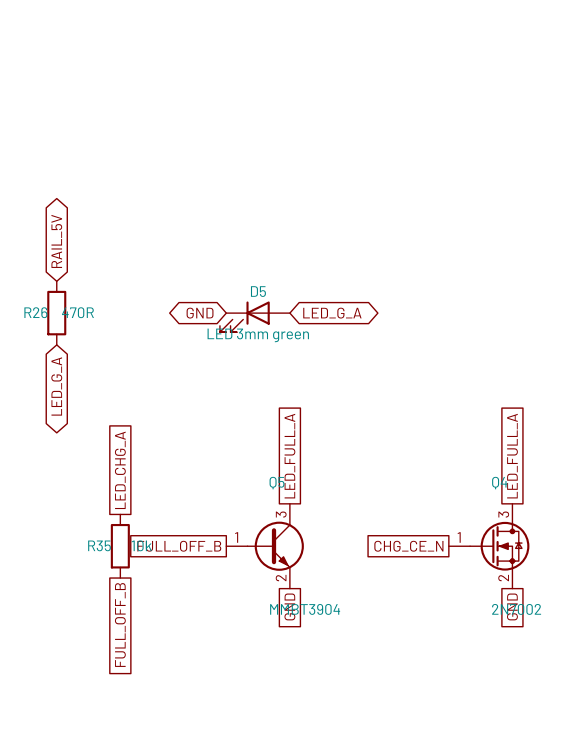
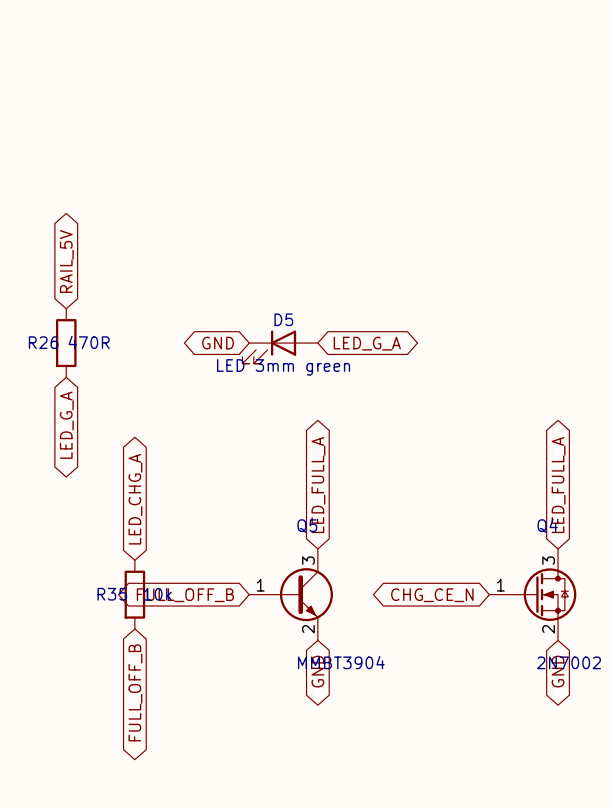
global label shape: passive (289, 456) -> bidirectional (318, 485)
global label shape: passive (512, 456) -> bidirectional (558, 485)
global label shape: passive (120, 470) -> bidirectional (135, 499)
global label shape: passive (179, 546) -> bidirectional (185, 595)
global label shape: passive (408, 546) -> bidirectional (432, 595)
global label shape: passive (289, 606) -> bidirectional (317, 671)
global label shape: passive (512, 606) -> bidirectional (558, 671)
global label shape: passive (120, 625) -> bidirectional (135, 692)

